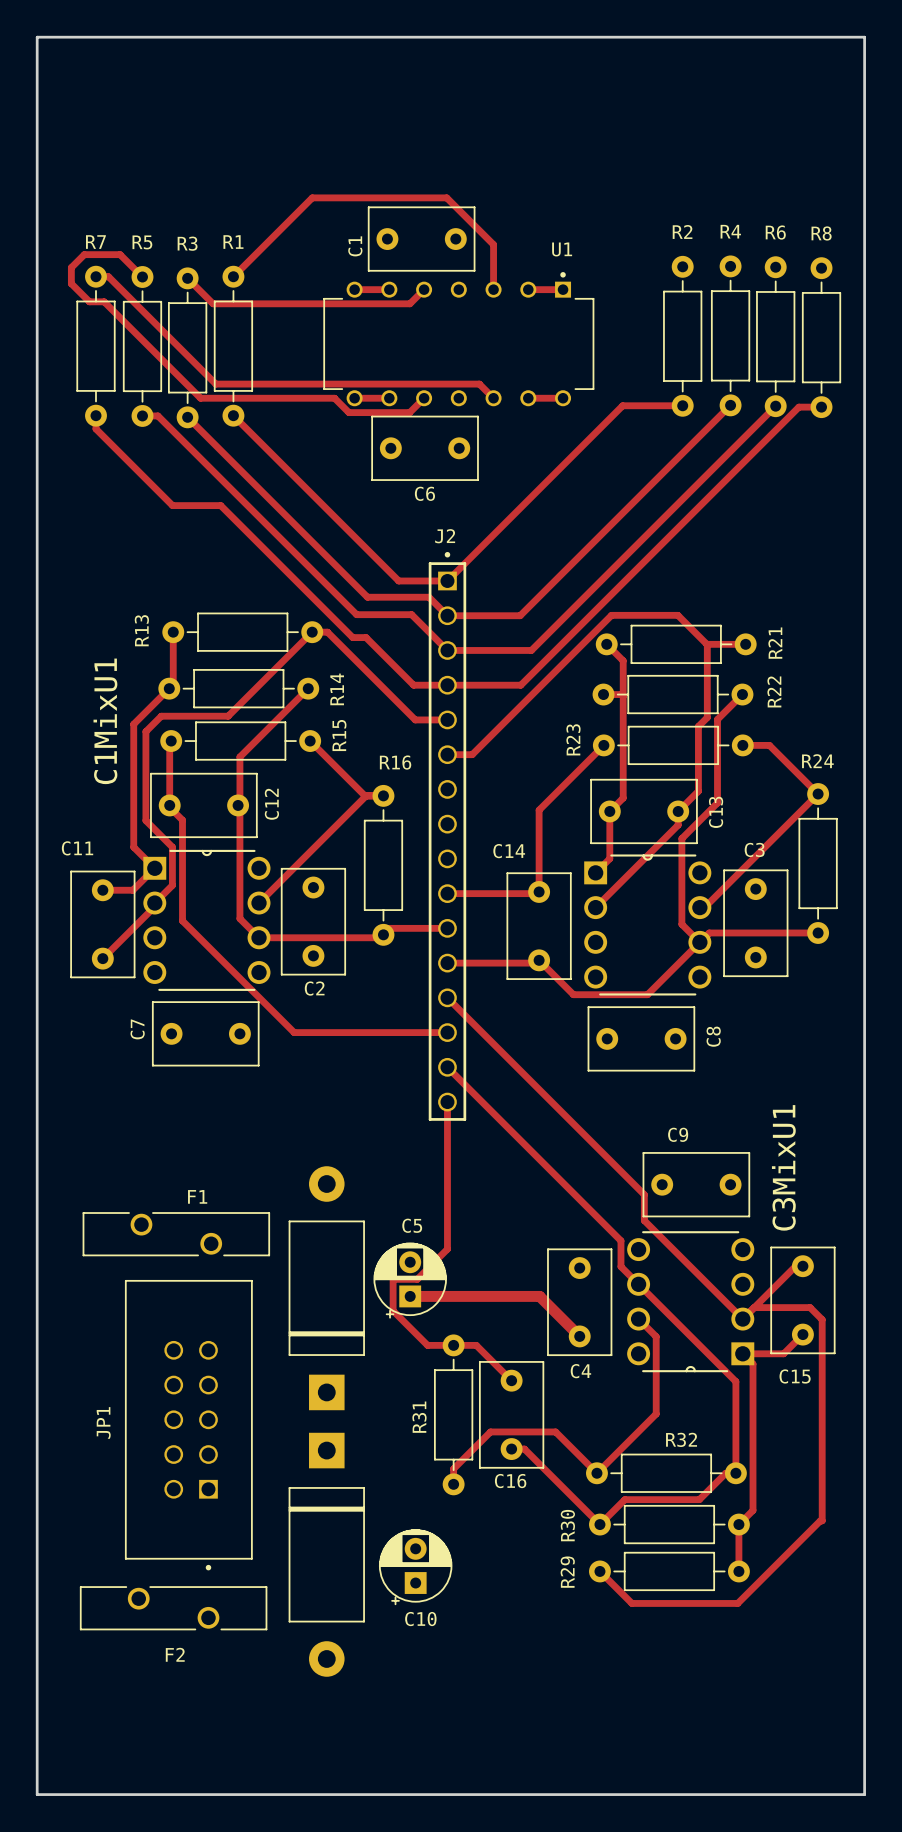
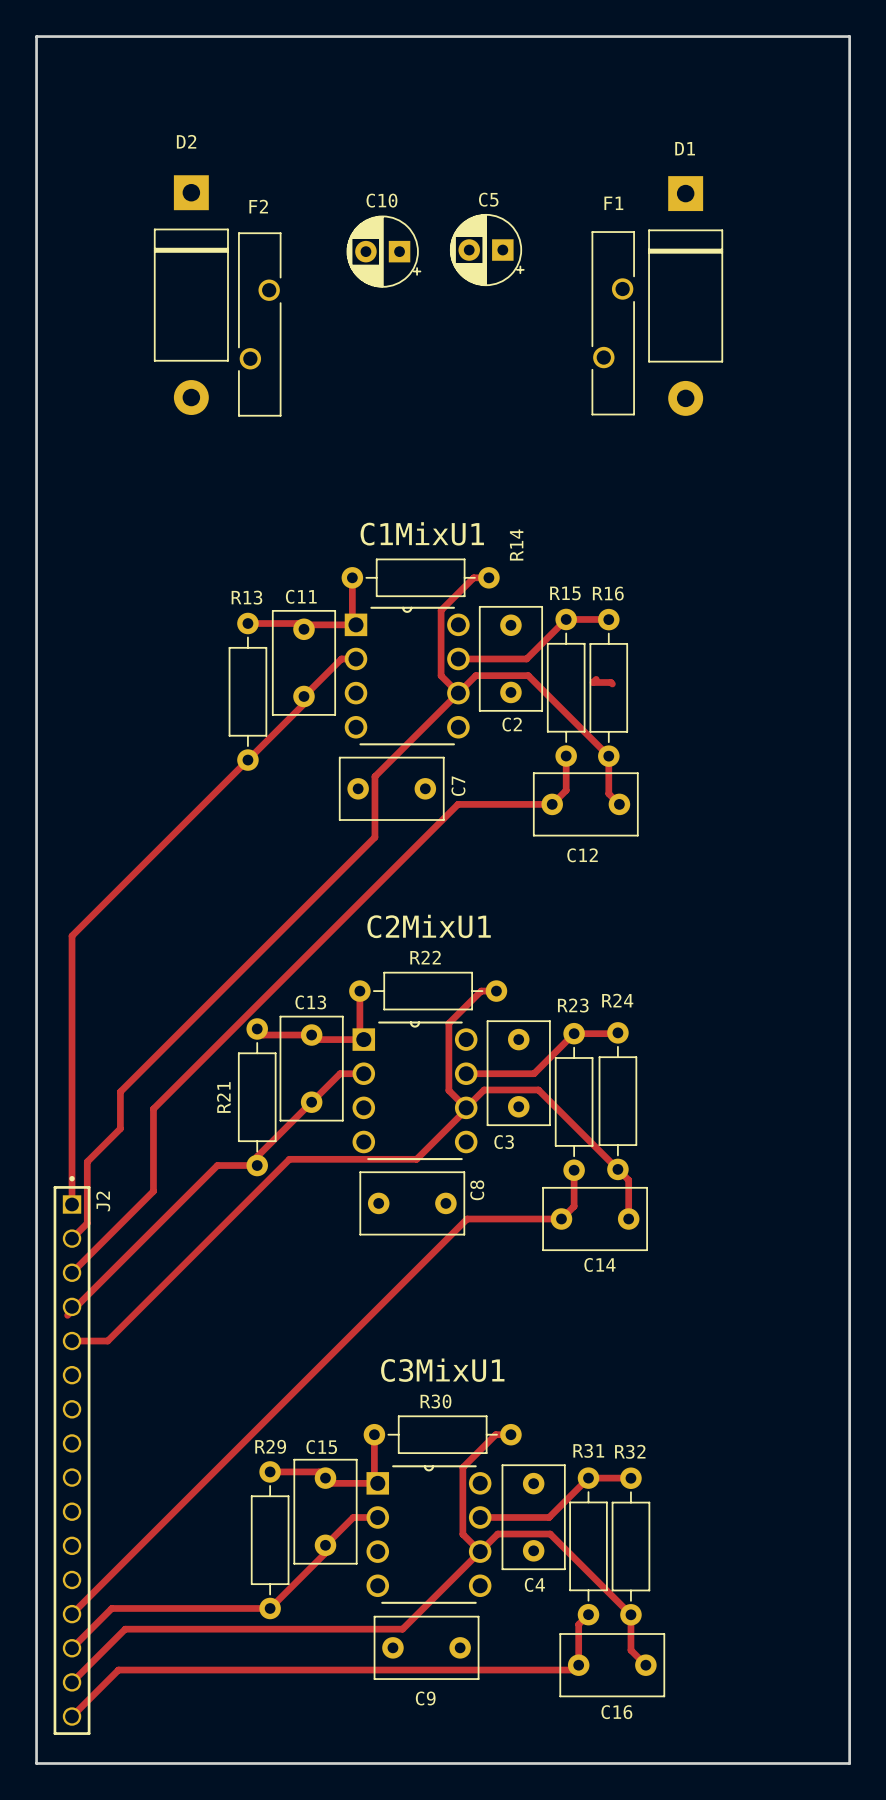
C1: (421, 239) -> none
track: (95, 276) (108, 276) (215, 384) (479, 384) (493, 398) -> none
track: (233, 276) (312, 197) (446, 197) (493, 244) (493, 289) -> none
track: (142, 277) (120, 254) (84, 254) (71, 267) (71, 283) (89, 301) (104, 301) (200, 398) (334, 398) (348, 412) (409, 412) (424, 398) -> none
track: (187, 278) (213, 303) (409, 303) (424, 289) -> none
track: (354, 289) (389, 289) -> none
track: (528, 289) (563, 289) -> none
D2: none -> (191, 295)
D1: none -> (685, 295)
R4: (730, 335) -> none
R2: (682, 336) -> none
R6: (775, 336) -> none
R8: (821, 337) -> none
U1: (458, 339) -> none
R7: (95, 346) -> none
R5: (142, 346) -> none
R1: (233, 346) -> none
R3: (187, 347) -> none
track: (354, 398) (389, 398) -> none
track: (528, 398) (563, 398) -> none
track: (682, 405) (622, 405) (447, 580) (398, 580) (233, 415) -> none
track: (730, 405) (520, 615) (447, 615) (428, 597) (367, 597) (187, 417) -> none
track: (775, 406) (531, 650) (447, 650) (411, 614) (356, 614) (157, 415) (142, 415) -> none
track: (821, 407) (798, 407) (520, 685) (413, 685) (366, 637) (352, 637) (220, 505) (172, 505) (95, 429) (95, 415) -> none
C6: (425, 448) -> none
J2 name rotation: 0° (445, 536) -> 90° counterclockwise (103, 1201)
J2 name position: J2 (445, 536) -> J2 (103, 1201)
track: none -> (352, 577) (352, 621) (356, 624) (308, 624) (303, 629) (298, 623) (247, 623)
track: none -> (488, 577) (473, 577) (441, 610) (441, 675) (458, 693)
track: none -> (608, 619) (566, 619) (526, 658) (458, 658)
track: (173, 632) (173, 684) (133, 724) (133, 847) (154, 868) (132, 890) (102, 890) -> none
R13 rotation: 0° (242, 632) -> 90° clockwise (247, 691)
R21 name position: R21 (775, 643) -> R21 (223, 1097)
track: (606, 644) (623, 660) (623, 798) (609, 811) (609, 858) (595, 872) -> none
R21 rotation: 0° (676, 644) -> 90° clockwise (257, 1097)
R21 position: (676, 644) -> (257, 1097)
track: (706, 644) (745, 645) -> none
track: none -> (356, 658) (341, 658) (303, 696) (303, 704) (72, 935) (72, 1204)
R14 position: (238, 688) -> (420, 577)
track: (308, 688) (239, 756) (239, 918) (259, 937) (380, 937) (389, 928) (447, 928) -> none
R14 name position: R14 (337, 689) -> R14 (516, 544)
R22 name rotation: 0° (774, 691) -> 90° clockwise (425, 957)
R22 name position: R22 (774, 691) -> R22 (425, 957)
R22 position: (673, 694) -> (428, 991)
track: (742, 694) (717, 719) (717, 803) (681, 838) (681, 924) (699, 942) -> none
track: (447, 719) (415, 719) (327, 632) (312, 632) (228, 716) (161, 716) (145, 731) (145, 820) (172, 847) (172, 885) (154, 903) (154, 906) (102, 958) -> none
C1MixU1 name rotation: 0° (105, 721) -> 90° clockwise (422, 533)
R15 name position: R15 (339, 735) -> R15 (565, 593)
track: (171, 741) (169, 807) (182, 820) (182, 920) (294, 1032) (447, 1032) -> none
R15 rotation: 0° (240, 741) -> 90° clockwise (566, 687)
R15 position: (240, 741) -> (566, 687)
track: (310, 741) (365, 795) (383, 795) -> none
track: (603, 745) (539, 810) (539, 891) (537, 893) (447, 893) -> none
R23 rotation: 0° (673, 745) -> 90° clockwise (574, 1101)
R23 position: (673, 745) -> (574, 1101)
track: (742, 745) (769, 745) (818, 794) (704, 907) (699, 907) -> none
track: (447, 754) (472, 754) (611, 615) (677, 615) (707, 644) (707, 717) (698, 726) (698, 791) (678, 811) (678, 825) (595, 907) -> none
R16 name position: R16 (395, 762) -> R16 (608, 593)
track: none -> (566, 756) (566, 790) (552, 804) (458, 804) (153, 1108) (153, 1191) (72, 1272)
track: (366, 795) (259, 903) -> none
C12 name rotation: 0° (271, 804) -> 90° clockwise (582, 855)
C12 name position: C12 (271, 804) -> C12 (582, 855)
C12 position: (203, 805) -> (585, 804)
C13 rotation: 0° (644, 811) -> 90° clockwise (311, 1068)
C13 position: (644, 811) -> (311, 1068)
C13 name position: C13 (716, 812) -> C13 (310, 1002)
track: none -> (619, 804) (608, 793) (608, 756) (528, 675) (475, 675) (374, 776) (374, 837) (120, 1091) (120, 1128) (87, 1161) (87, 1223) (72, 1238)
J2 position: (447, 836) -> (72, 1455)
C11 name position: C11 (77, 848) -> C11 (301, 596)
C3 name position: C3 (754, 849) -> C3 (504, 1142)
C14 name position: C14 (509, 851) -> C14 (599, 1264)
R24 position: (818, 863) -> (617, 1101)
R16 position: (383, 865) -> (608, 687)
C1MixU1 position: (206, 920) -> (407, 676)
C2 position: (313, 921) -> (510, 658)
C3 position: (755, 923) -> (518, 1073)
C11 position: (102, 924) -> (303, 662)
part: (647, 924) -> none
C14 rotation: 0° (539, 926) -> 90° clockwise (595, 1219)
C14 position: (539, 926) -> (595, 1219)
track: (818, 932) (709, 932) (647, 994) (573, 994) (539, 960) (536, 963) (447, 963) -> none
track: (447, 997) (644, 1194) (644, 1220) (742, 1319) (795, 1266) (798, 1267) -> none
track: none -> (359, 991) (359, 1035) (363, 1039) (316, 1039) (311, 1035) (263, 1035) (257, 1028)
track: none -> (496, 991) (481, 991) (448, 1023) (448, 1090) (466, 1107)
C7 name position: C7 (137, 1029) -> C7 (458, 786)
C7 position: (205, 1033) -> (391, 788)
C8 name position: C8 (713, 1036) -> C8 (477, 1190)
C8 position: (641, 1038) -> (412, 1203)
track: none -> (617, 1032) (574, 1033) (534, 1073) (466, 1073)
track: (447, 1067) (620, 1240) (620, 1266) (735, 1381) (735, 1473) (725, 1473) (699, 1499) (624, 1499) (599, 1524) (524, 1449) (511, 1449) -> none
track: none -> (363, 1073) (340, 1073) (257, 1156) (257, 1165) (217, 1165) (67, 1315)
track: (447, 1102) (447, 1249) (417, 1279) (393, 1279) (393, 1310) (427, 1345) (476, 1345) (511, 1380) -> none
C2MixU1: none -> (414, 1090)
track: none -> (466, 1107) (484, 1089) (538, 1089) (628, 1180) (628, 1219)
track: none -> (466, 1107) (416, 1159) (289, 1159) (107, 1341) (72, 1341)
C9 name position: C9 (678, 1134) -> C9 (425, 1698)
C3MixU1 name position: C3MixU1 (783, 1167) -> C3MixU1 (442, 1370)
C9 position: (696, 1184) -> (426, 1647)
track: none -> (574, 1170) (574, 1206) (561, 1219) (467, 1219) (72, 1614)
F1 name position: F1 (197, 1196) -> F1 (613, 203)
F1 rotation: 0° (176, 1234) -> 90° counterclockwise (613, 323)
F1 position: (176, 1234) -> (613, 323)
C5 rotation: 0° (410, 1280) -> 90° counterclockwise (487, 250)
C5 position: (410, 1280) -> (487, 250)
part: (326, 1288) -> none
track: (410, 1296) (539, 1296) (579, 1336) -> none
C15 position: (802, 1300) -> (325, 1511)
C3MixU1 rotation: 0° (690, 1301) -> 180° (428, 1534)
C3MixU1 position: (690, 1301) -> (428, 1534)
C4 position: (579, 1302) -> (533, 1517)
track: (754, 1307) (810, 1307) (822, 1319) (822, 1520) (737, 1603) (631, 1603) (599, 1571) -> none
track: (638, 1319) (656, 1336) (656, 1414) (596, 1473) (555, 1431) (490, 1431) (453, 1468) (453, 1484) -> none
track: (802, 1334) (783, 1353) (742, 1353) (753, 1363) (753, 1510) (738, 1524) (738, 1571) -> none
C15 name position: C15 (795, 1376) -> C15 (321, 1447)
R31 position: (453, 1414) -> (588, 1546)
C16 rotation: 0° (511, 1414) -> 90° clockwise (612, 1665)
C16 position: (511, 1414) -> (612, 1665)
R31 name rotation: 0° (419, 1417) -> 90° clockwise (588, 1450)
R31 name position: R31 (419, 1417) -> R31 (588, 1450)
JP1: (188, 1425) -> none
R32 name position: R32 (681, 1439) -> R32 (630, 1451)
track: none -> (374, 1434) (374, 1479) (377, 1483) (330, 1483) (319, 1471) (270, 1471)
track: none -> (510, 1434) (495, 1434) (462, 1467) (462, 1534) (480, 1551)
R32 rotation: 0° (666, 1473) -> 90° clockwise (630, 1546)
R32 position: (666, 1473) -> (630, 1546)
track: none -> (630, 1478) (588, 1478) (549, 1517) (480, 1517)
R30 position: (669, 1524) -> (442, 1434)
R30 name rotation: 0° (567, 1525) -> 90° clockwise (435, 1401)
R30 name position: R30 (567, 1525) -> R30 (435, 1401)
track: none -> (377, 1517) (353, 1517) (325, 1545) (325, 1553) (270, 1608) (111, 1608) (72, 1648)
part: (326, 1554) -> none
C10 rotation: 0° (415, 1567) -> 90° counterclockwise (383, 251)
C10 position: (415, 1567) -> (383, 251)
R29 rotation: 0° (669, 1571) -> 90° clockwise (270, 1540)
R29 position: (669, 1571) -> (270, 1540)
F2 rotation: 0° (173, 1608) -> 90° counterclockwise (259, 324)
F2 position: (173, 1608) -> (259, 324)
C10 name position: C10 (420, 1619) -> C10 (381, 200)
track: none -> (588, 1614) (578, 1624) (578, 1665) (573, 1670) (118, 1670) (72, 1716)
F2 name position: F2 (175, 1654) -> F2 (258, 206)
track: none -> (645, 1665) (630, 1650) (630, 1614) (550, 1534) (497, 1534) (402, 1629) (125, 1629) (72, 1682)

